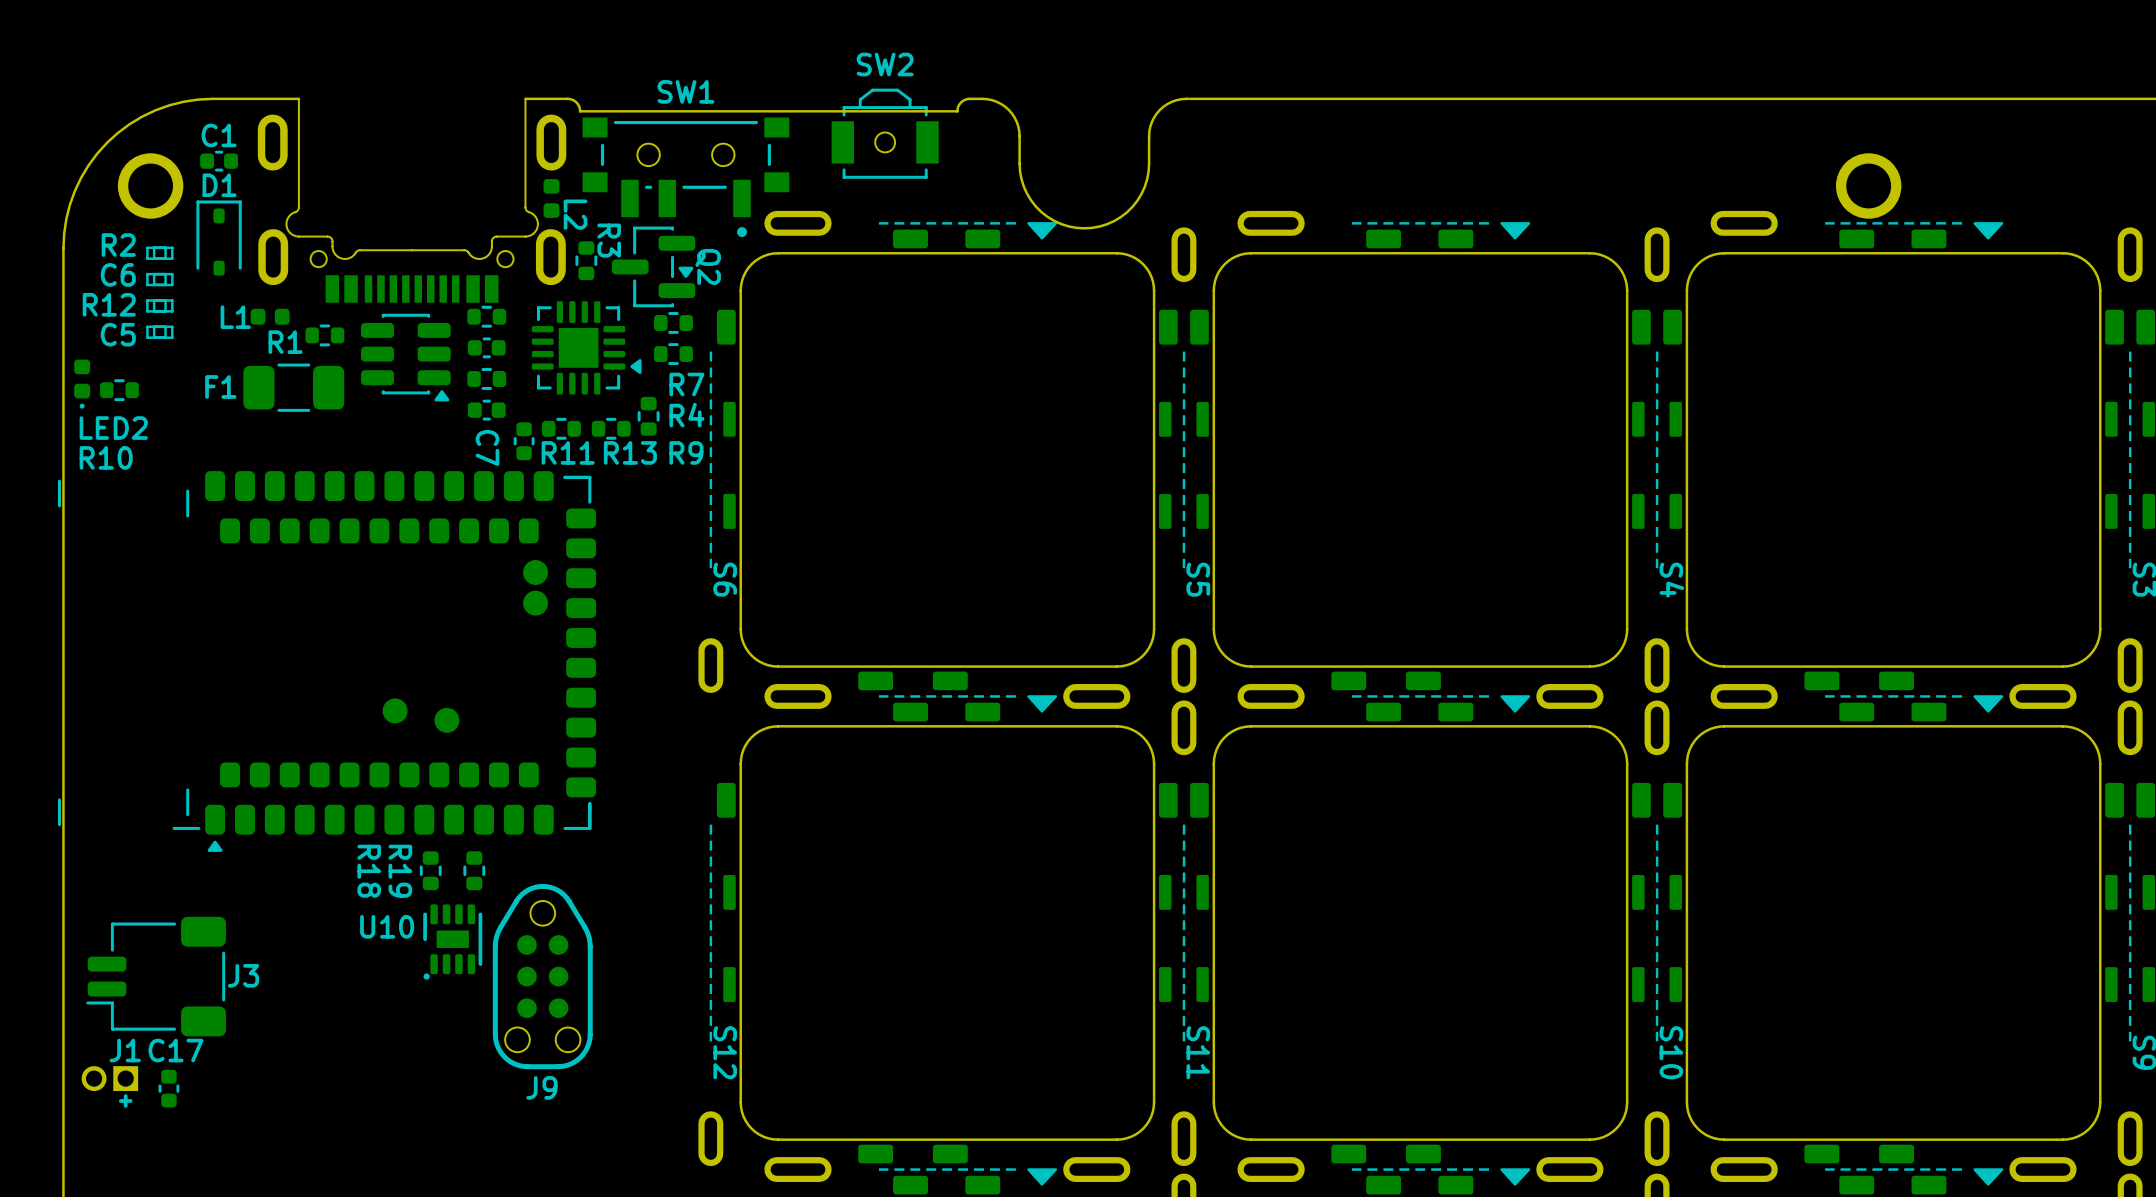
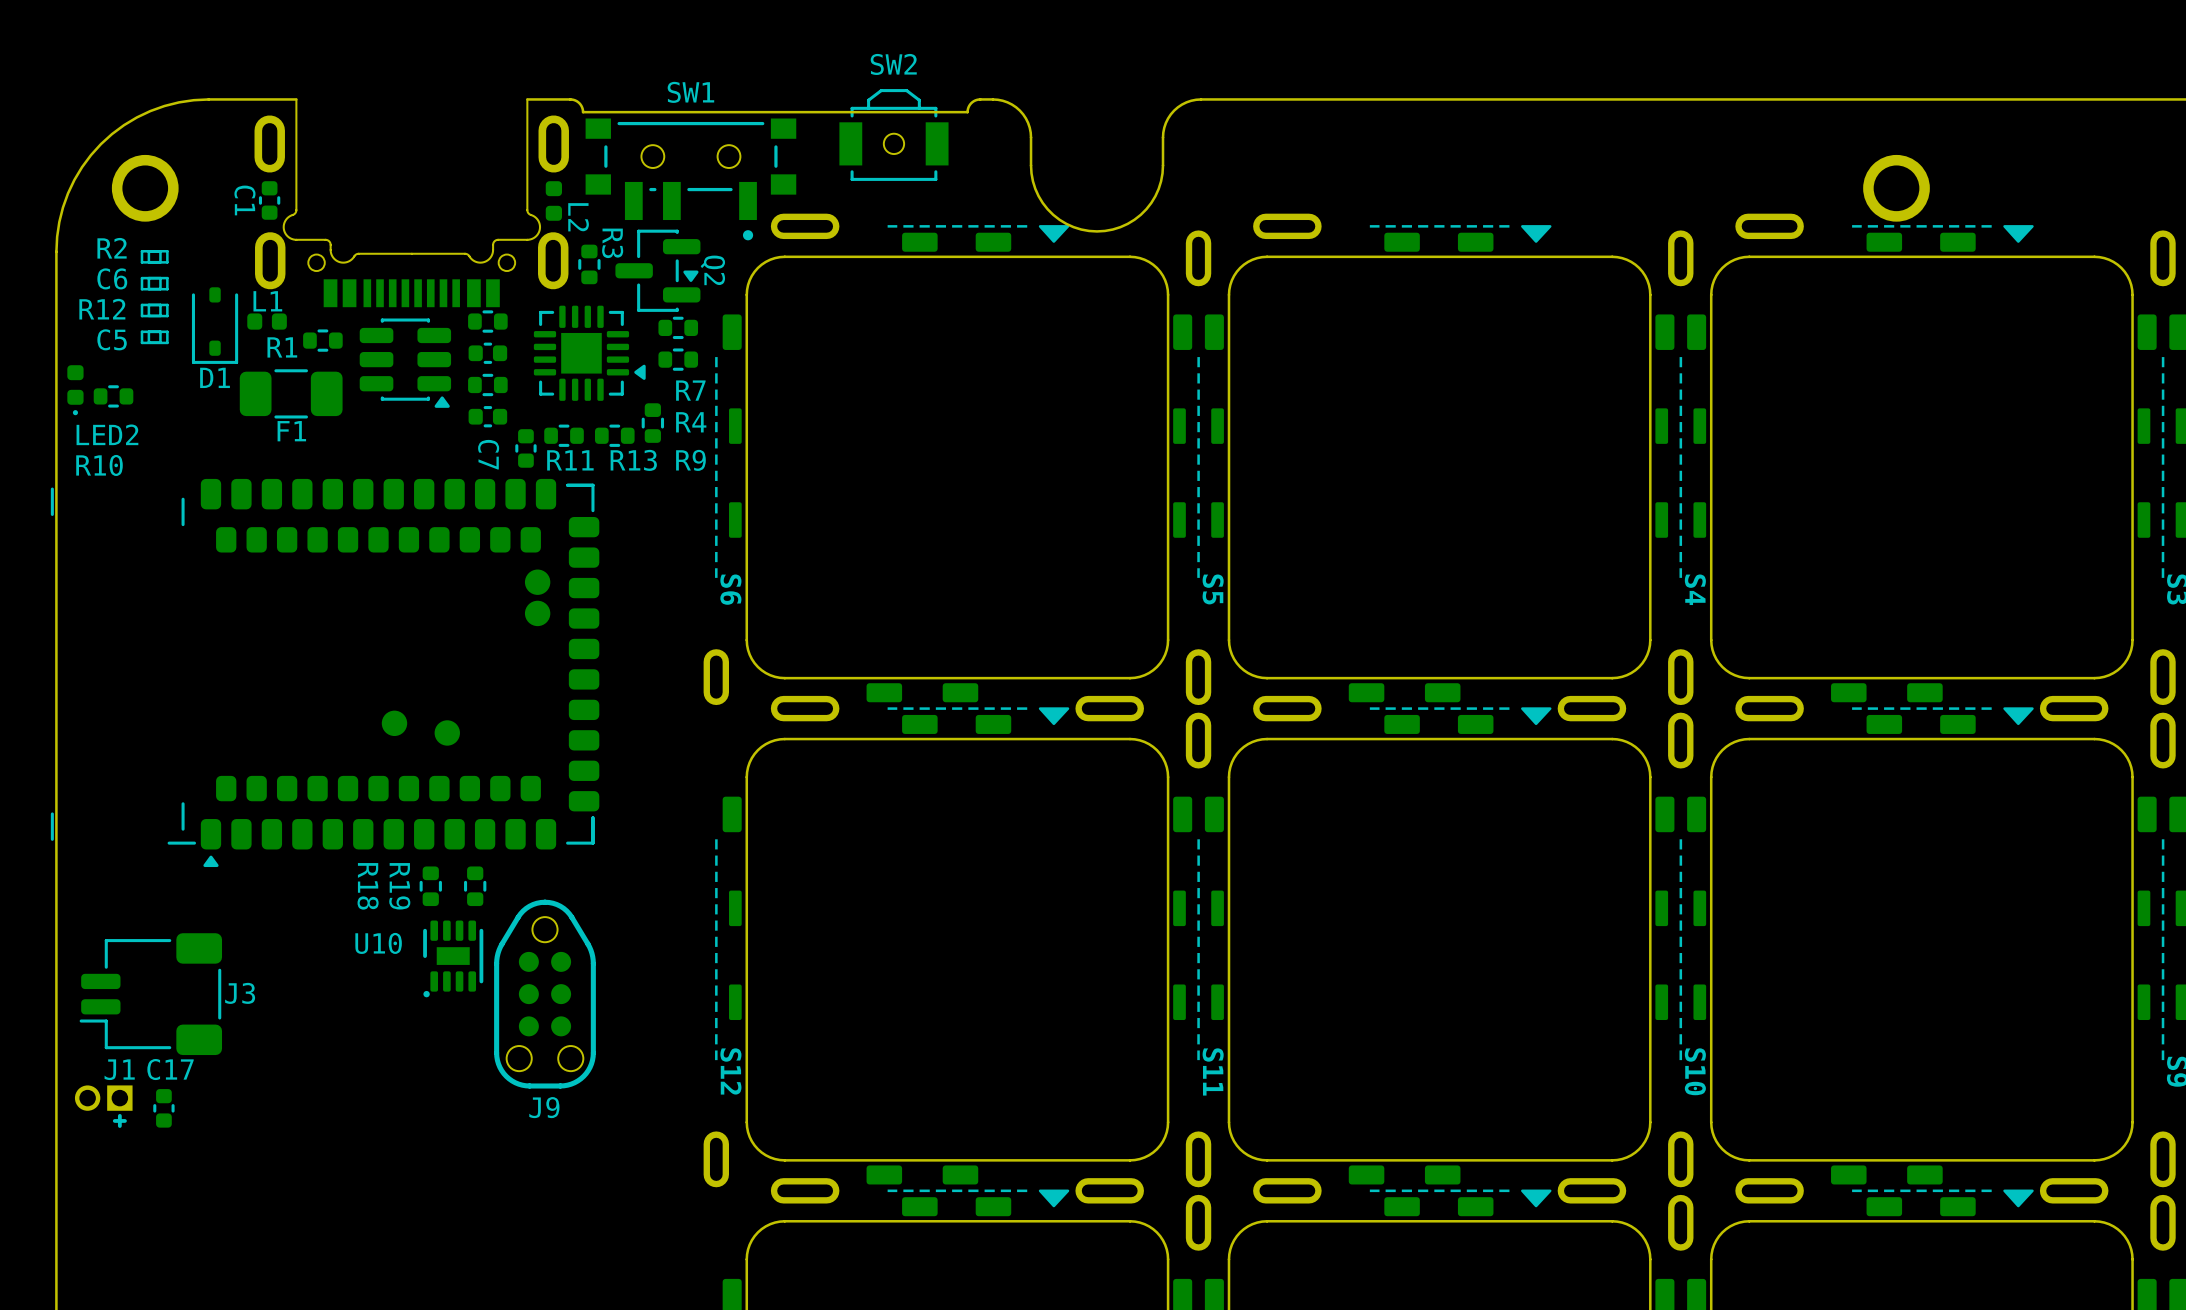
C1 rotation: 0° (219, 161) -> 90° clockwise (269, 200)
C1 position: (219, 161) -> (269, 200)
D1 rotation: 0° (219, 238) -> 180° (215, 325)
D1 position: (219, 238) -> (215, 325)
L1 name position: L1 (235, 317) -> L1 (267, 301)
F1 name position: F1 (220, 386) -> F1 (291, 431)

